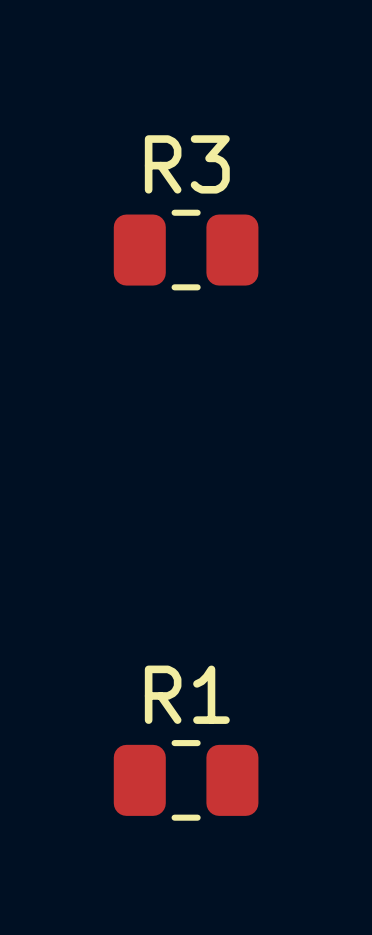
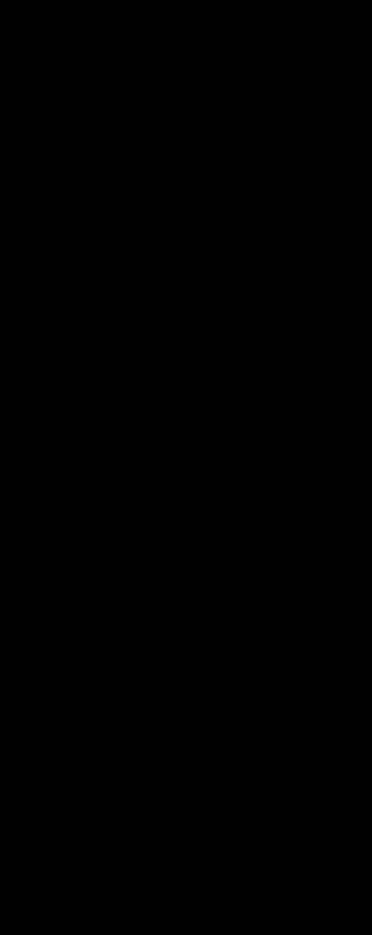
R3: (186, 250) -> none
R1: (186, 780) -> none

